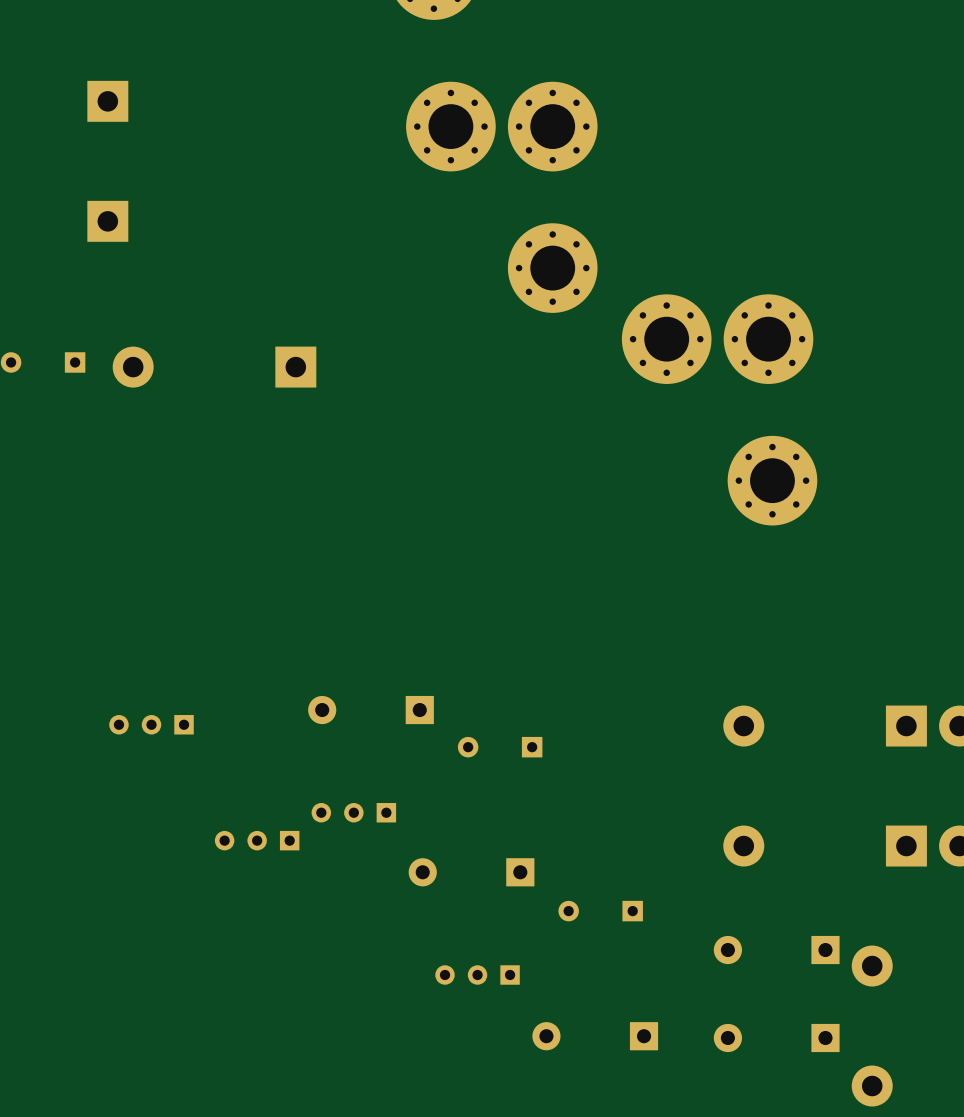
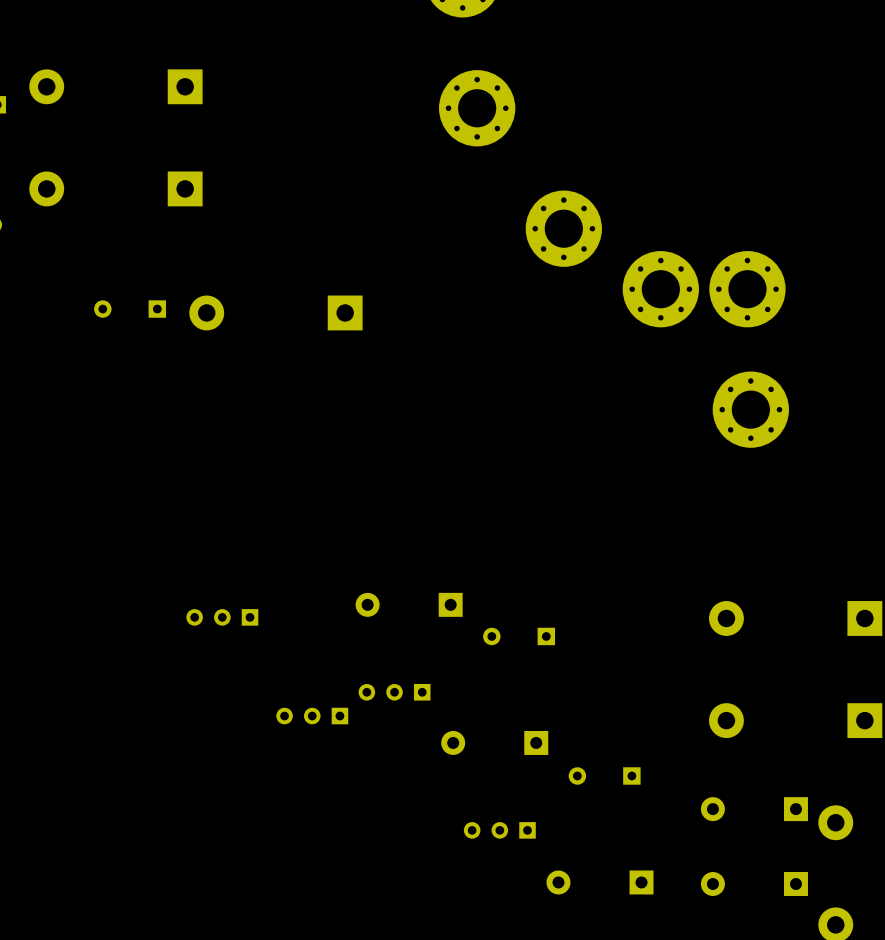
part: (552, 126) -> none

